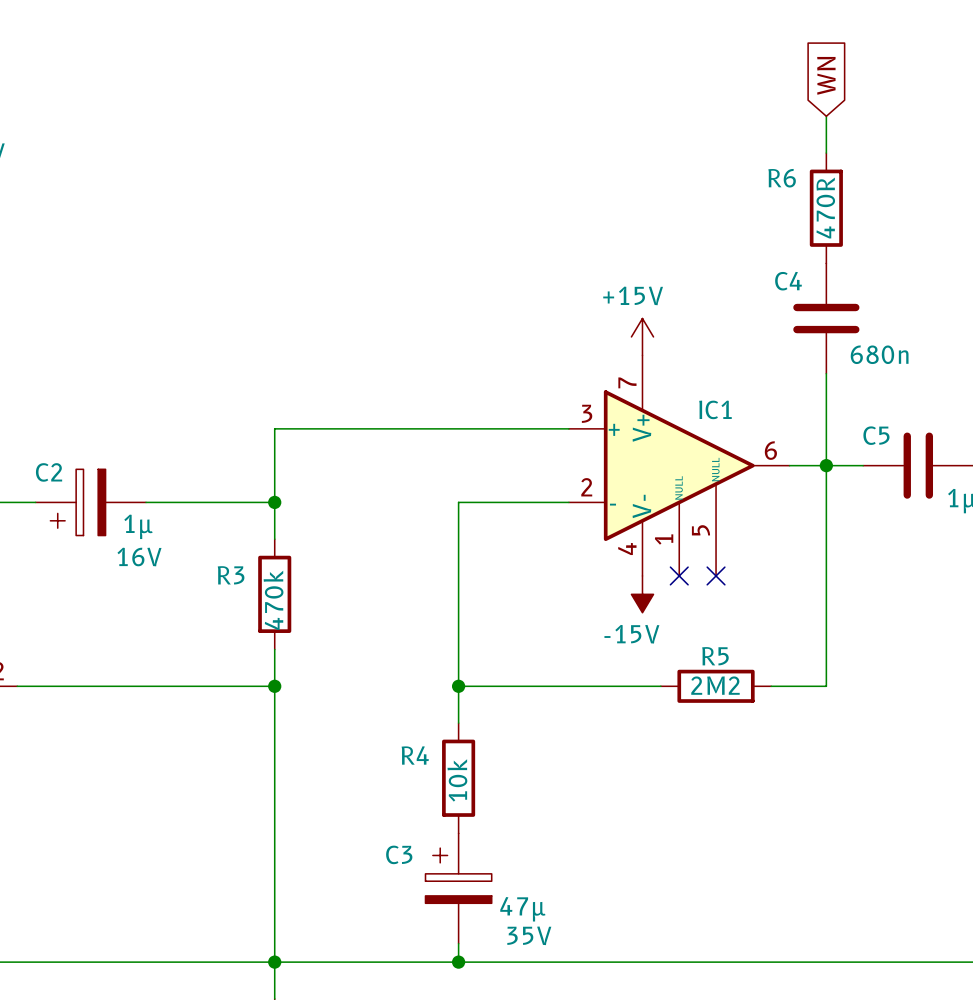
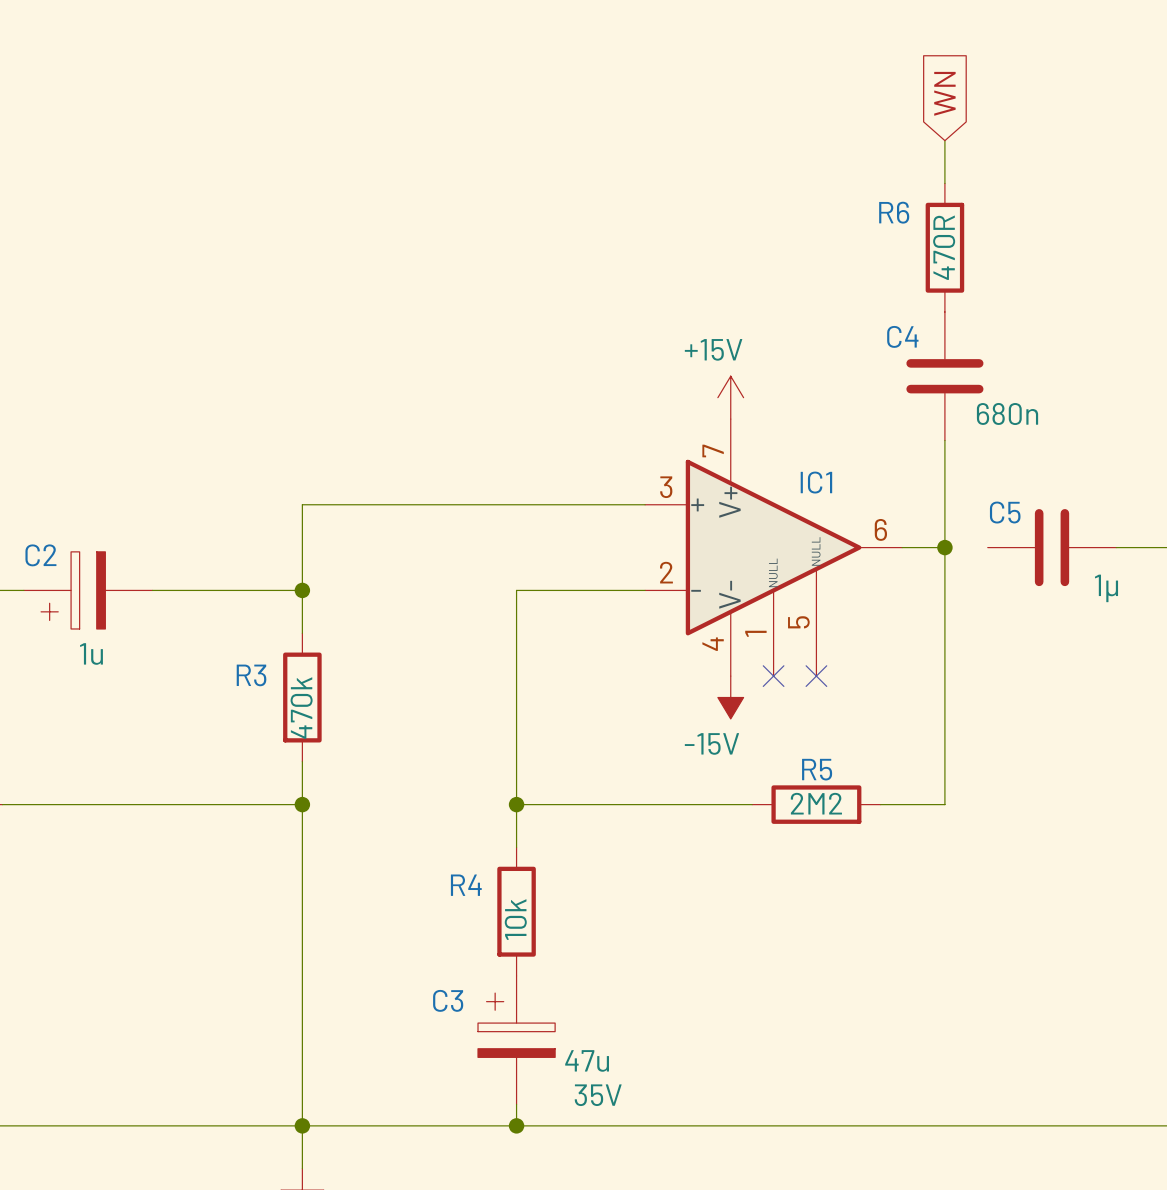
C4 name position: C4 (788, 281) -> C4 (902, 336)
C4 value position: 680n (879, 354) -> 680n (1007, 414)
wire: (826, 465) (863, 465) -> none
C2 value: 1µ (138, 526) -> 1u (91, 653)
C2 text: 16V (139, 557) -> none
C3 value: 47µ (522, 909) -> 47u (587, 1060)

